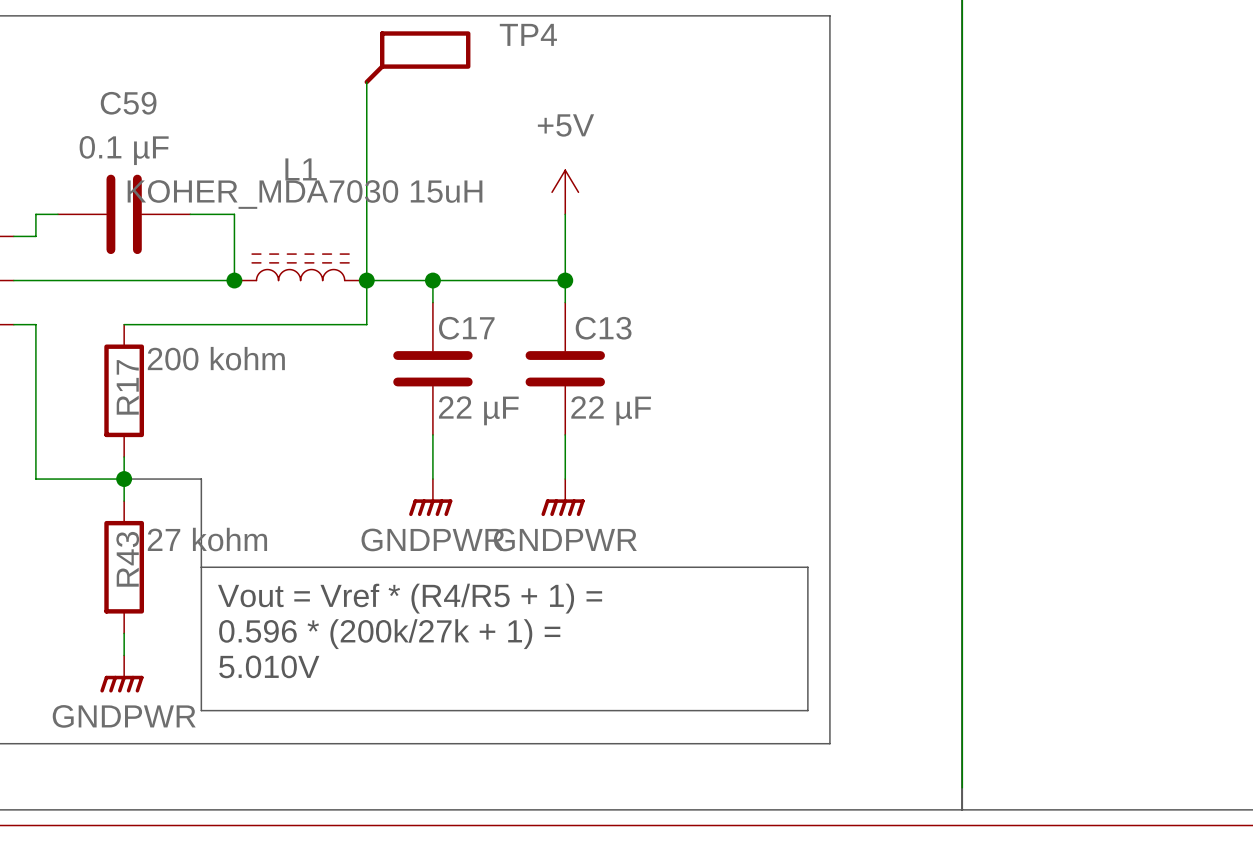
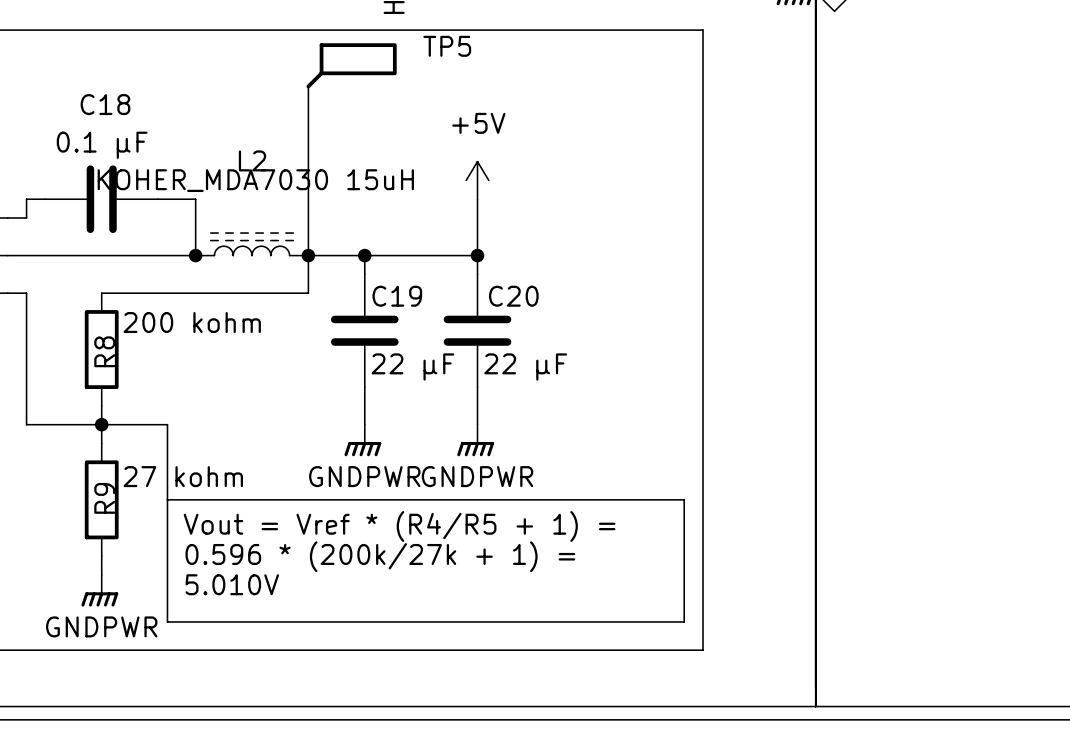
TP4 name: TP4 (528, 34) -> TP5 (447, 46)
C59 name: C59 (128, 103) -> C18 (105, 104)
L1 name: L1 (301, 169) -> L2 (252, 160)
C17 name: C17 (466, 328) -> C19 (397, 296)
C13 name: C13 (603, 328) -> C20 (513, 296)
R17 name: R17 (127, 387) -> R8 (104, 351)
R43 name: R43 (127, 559) -> R9 (104, 498)

